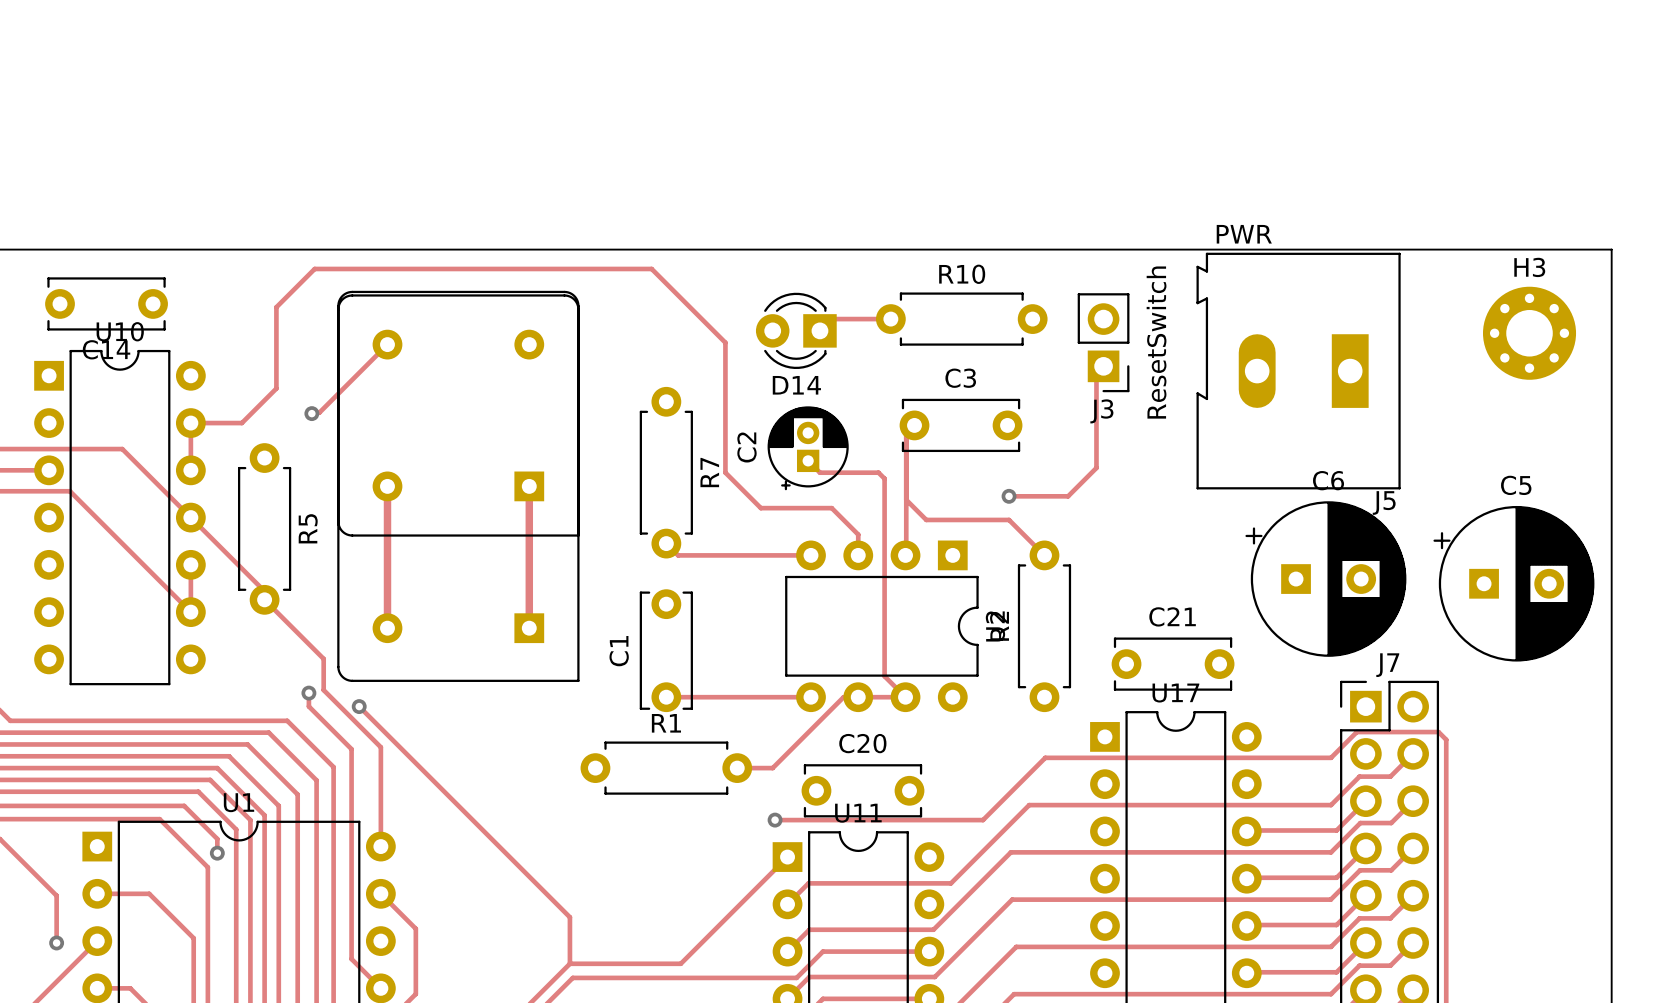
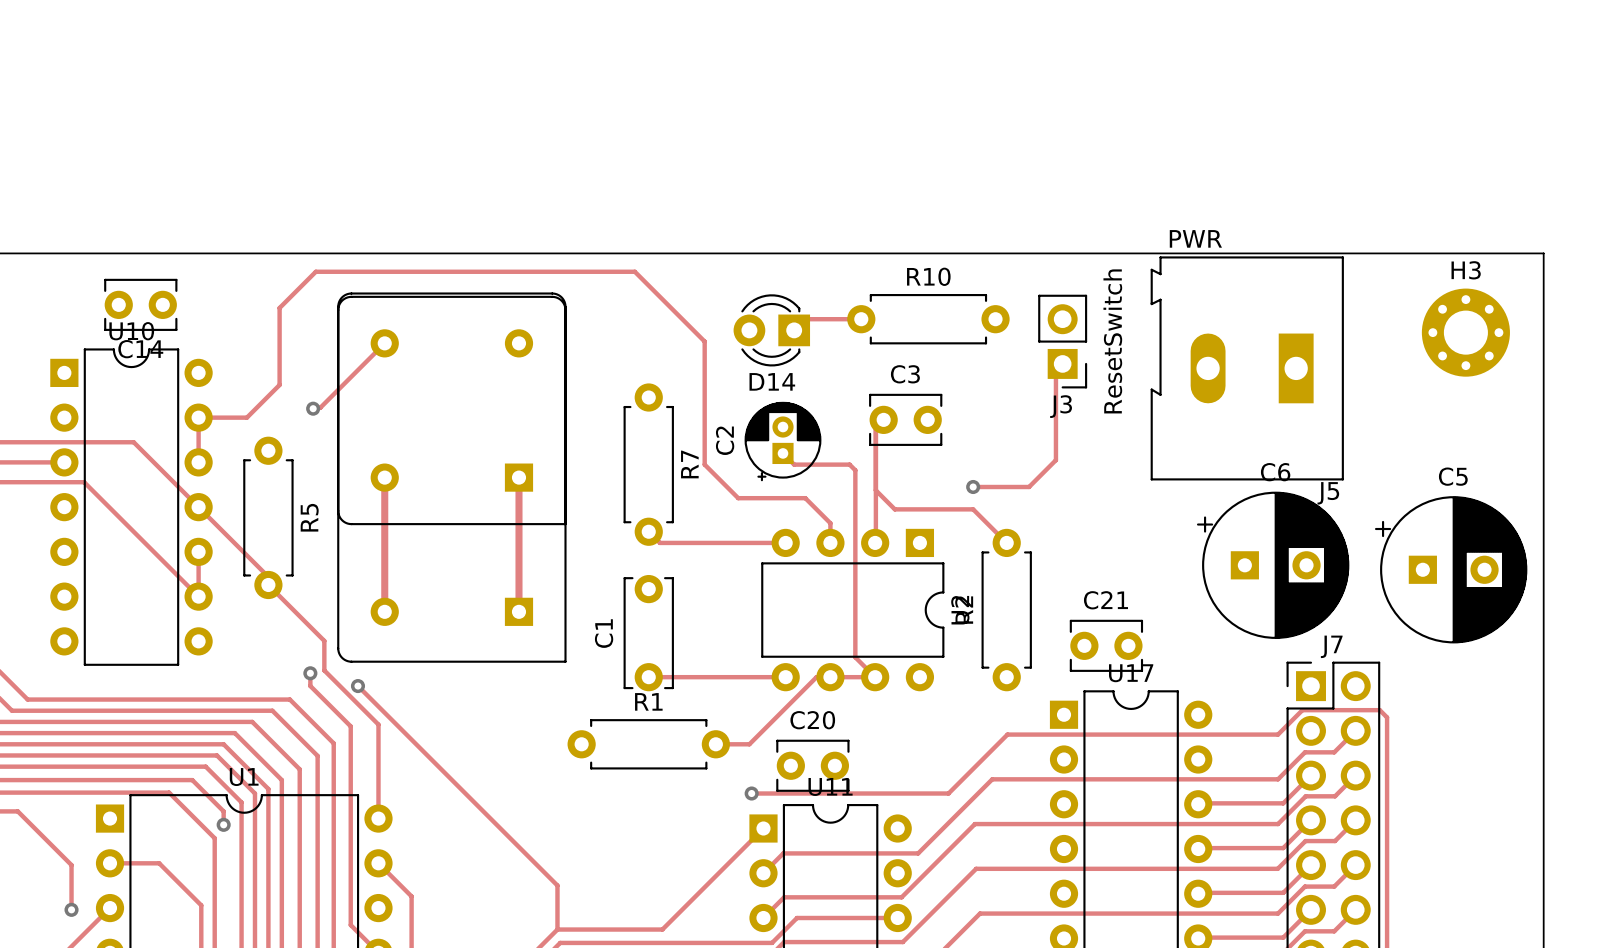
C14 footprint: [45, 277, 168, 331] -> [104, 278, 178, 331]
C3 footprint: [899, 398, 1023, 453] -> [869, 393, 943, 446]
C21 footprint: [1111, 637, 1235, 691] -> [1069, 619, 1144, 672]
C20 footprint: [801, 764, 925, 818] -> [776, 739, 850, 792]

